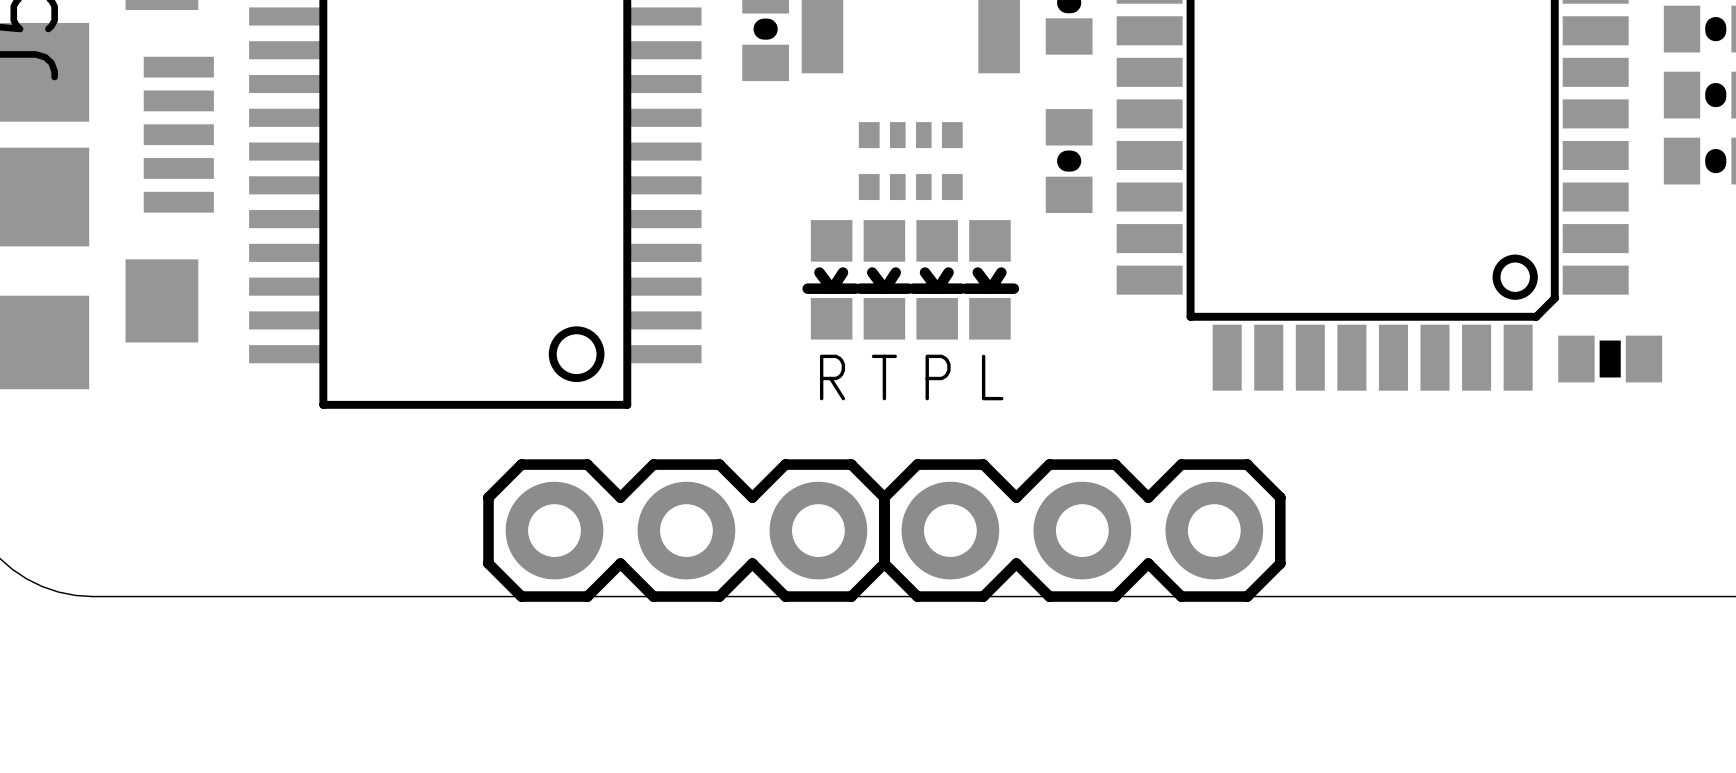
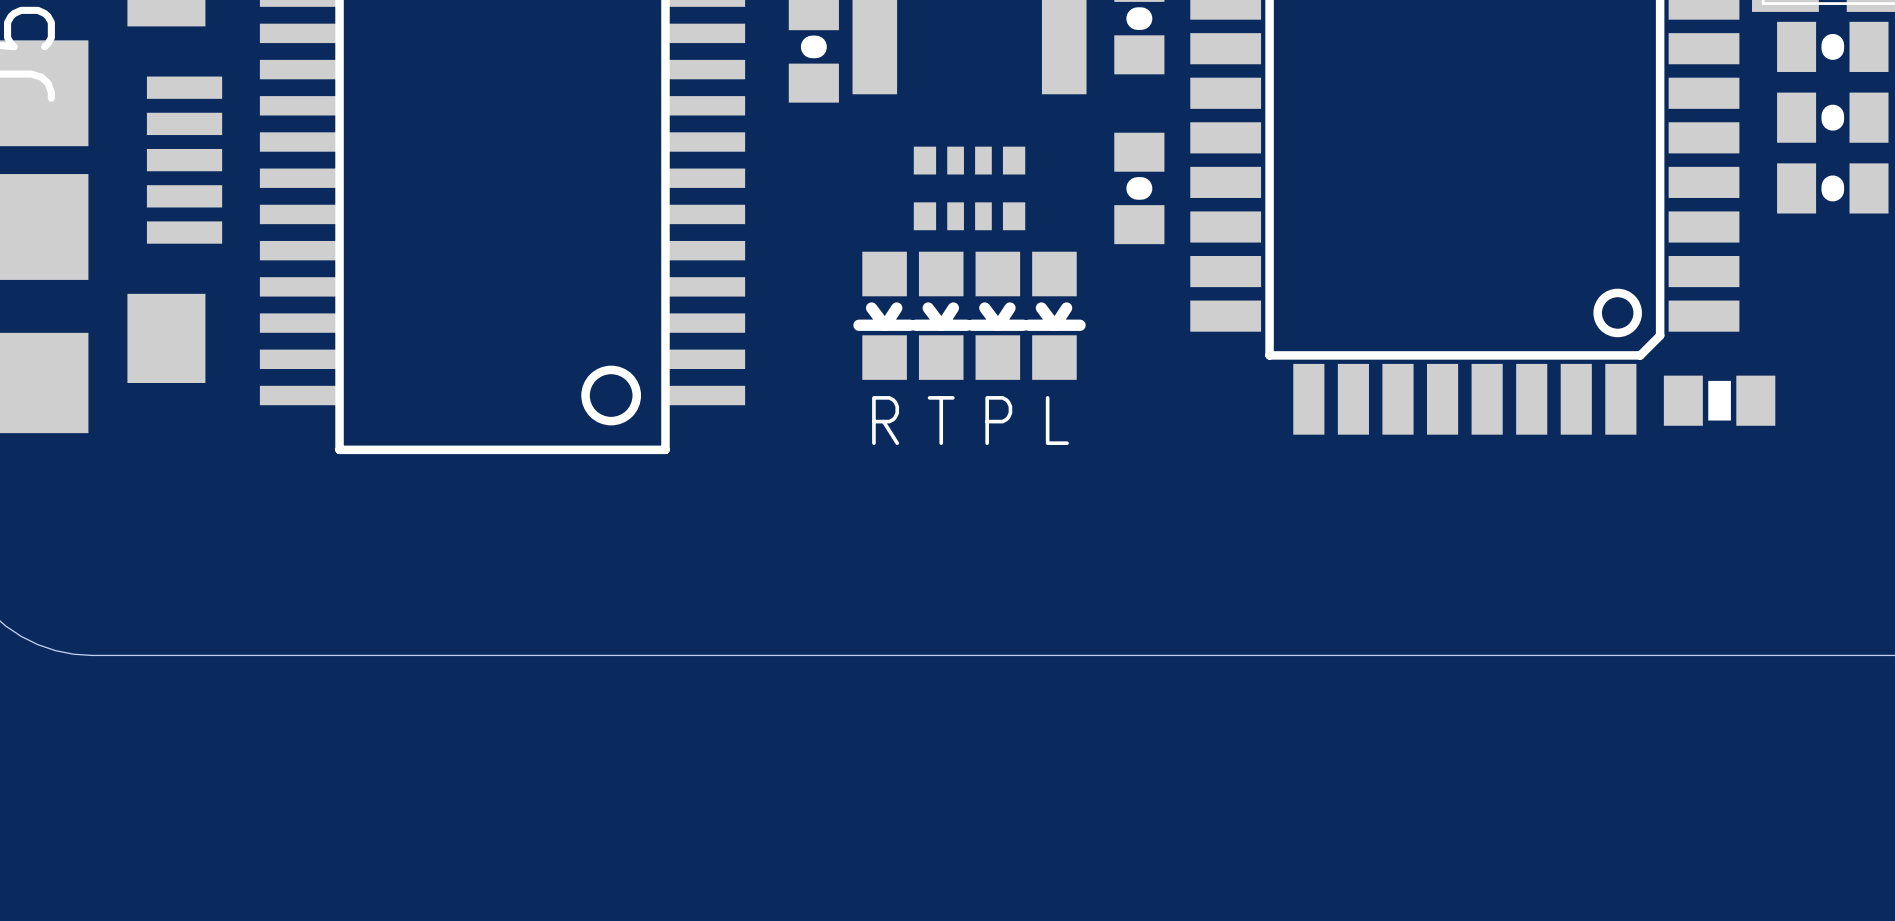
part: (686, 530) -> none
part: (1082, 530) -> none

